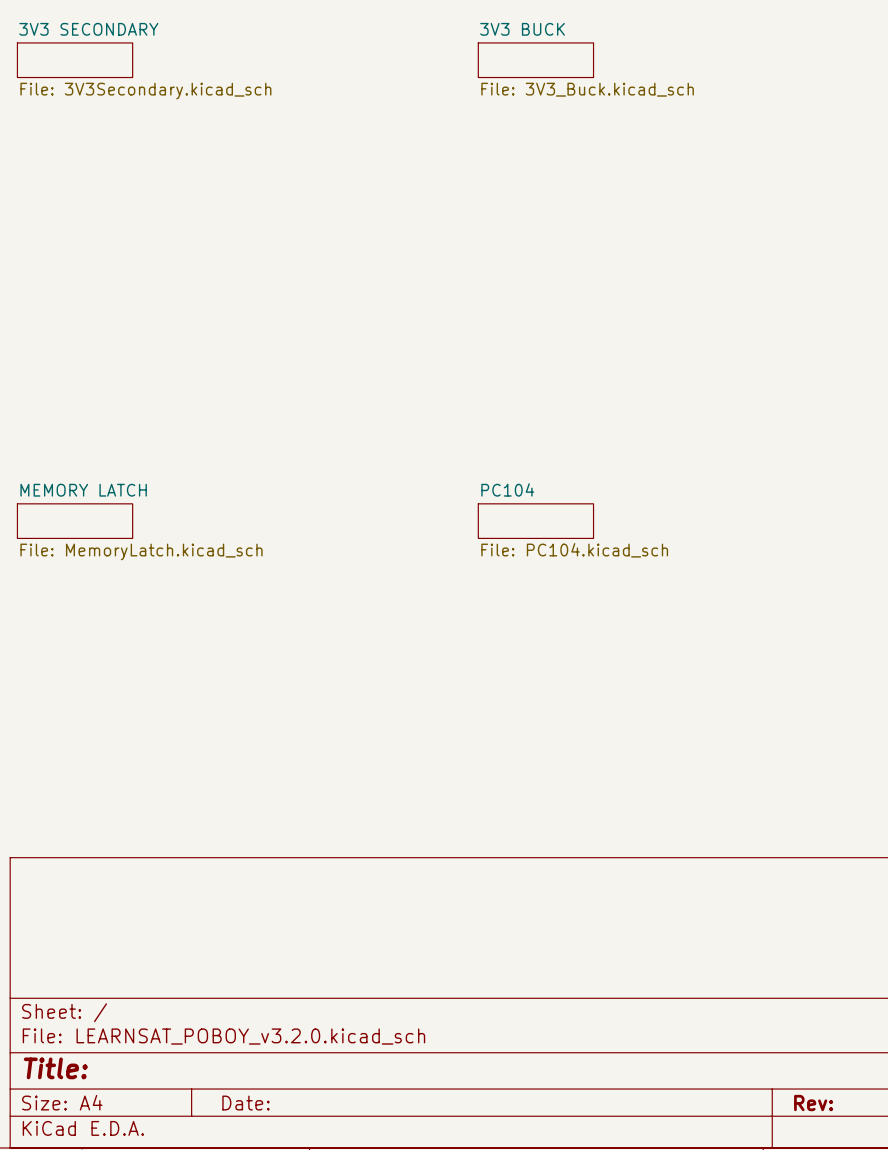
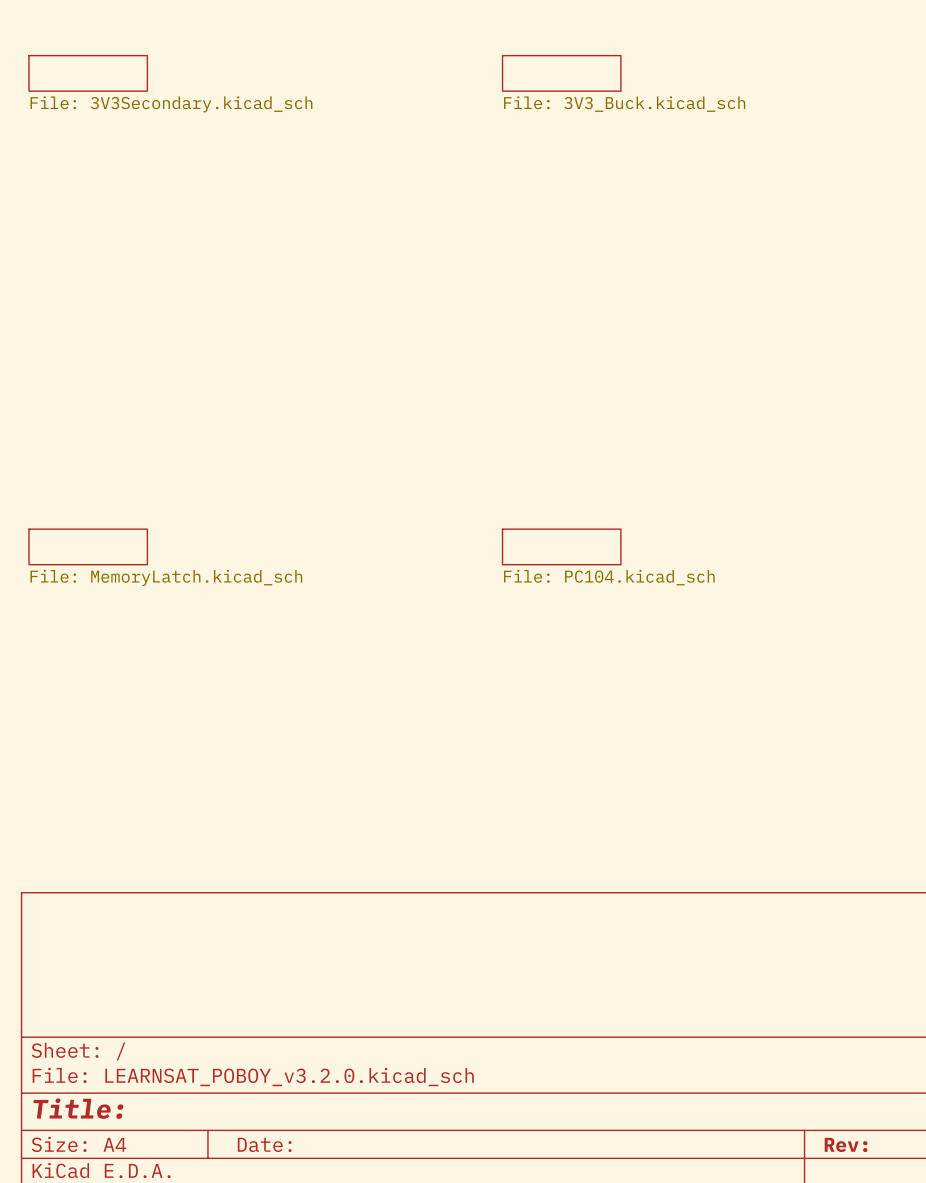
sheet 3V3 SECONDARY name: 3V3 SECONDARY (88, 29) -> none
sheet 3V3 BUCK name: 3V3 BUCK (522, 29) -> none
sheet PC104 name: PC104 (507, 489) -> none
sheet MEMORY LATCH name: MEMORY LATCH (83, 490) -> none

